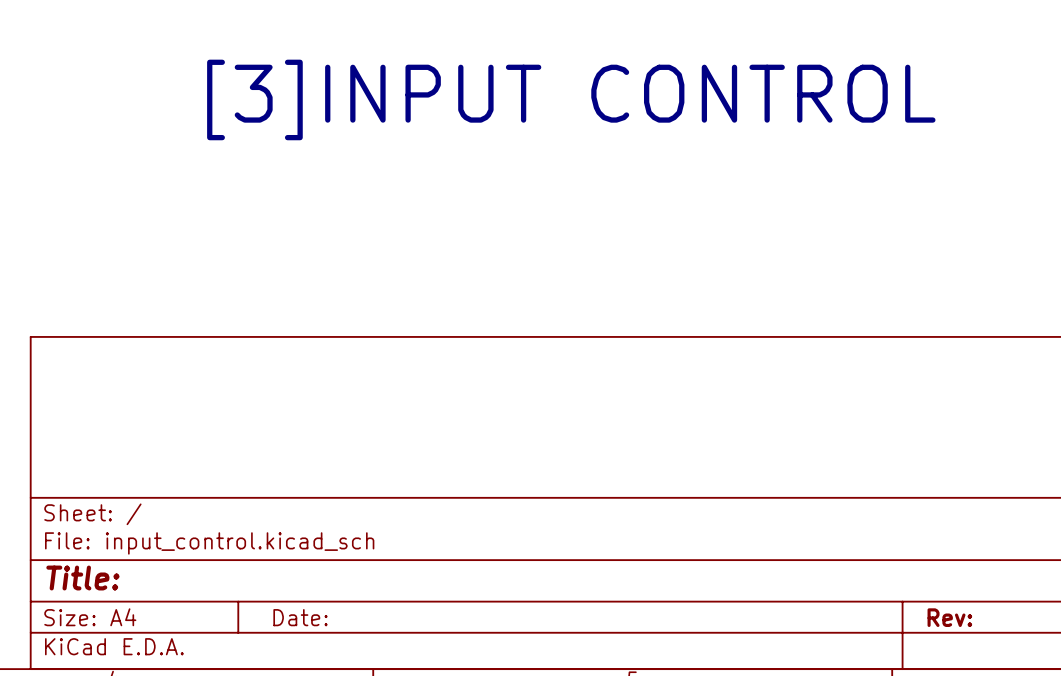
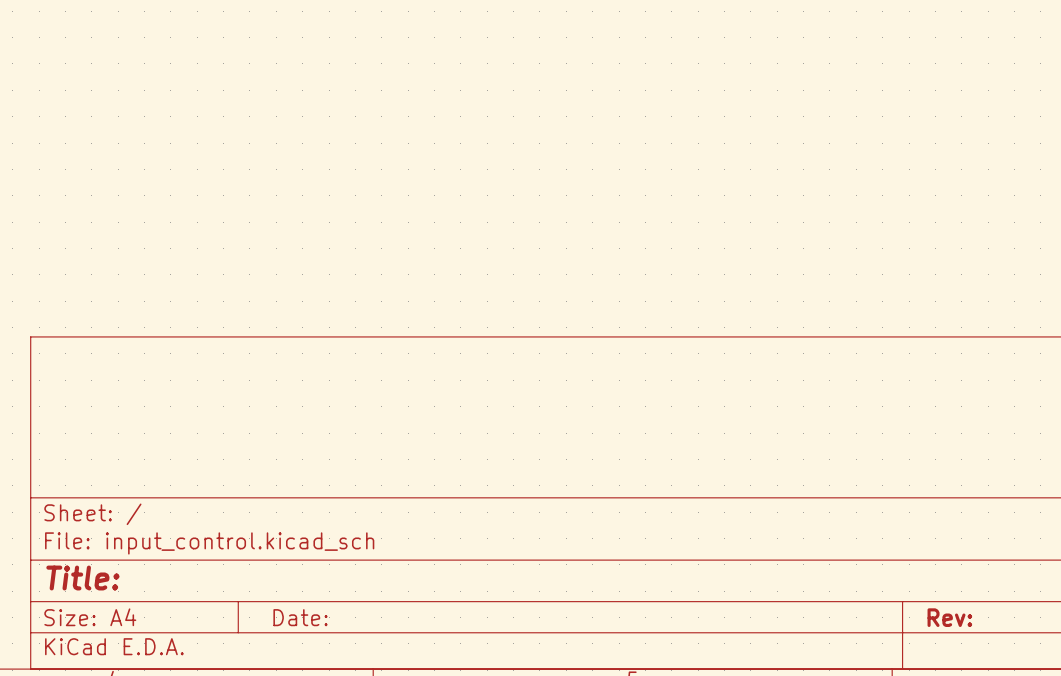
text: [3]INPUT CONTROL (571, 99) -> none

